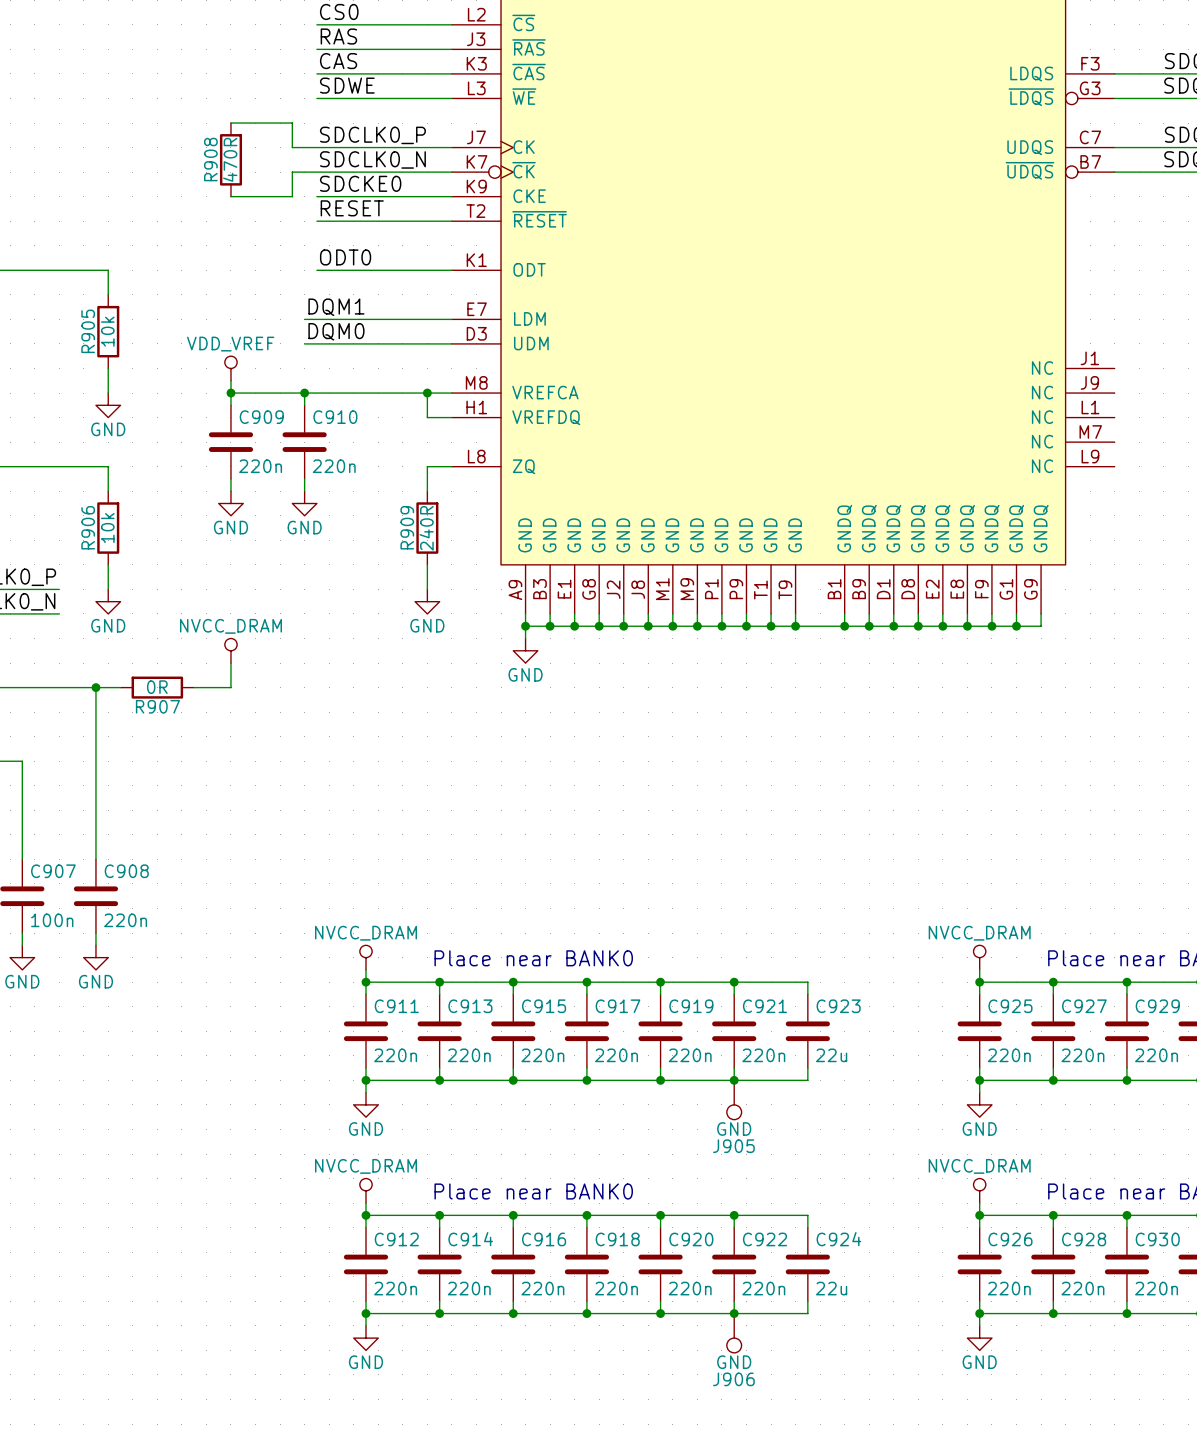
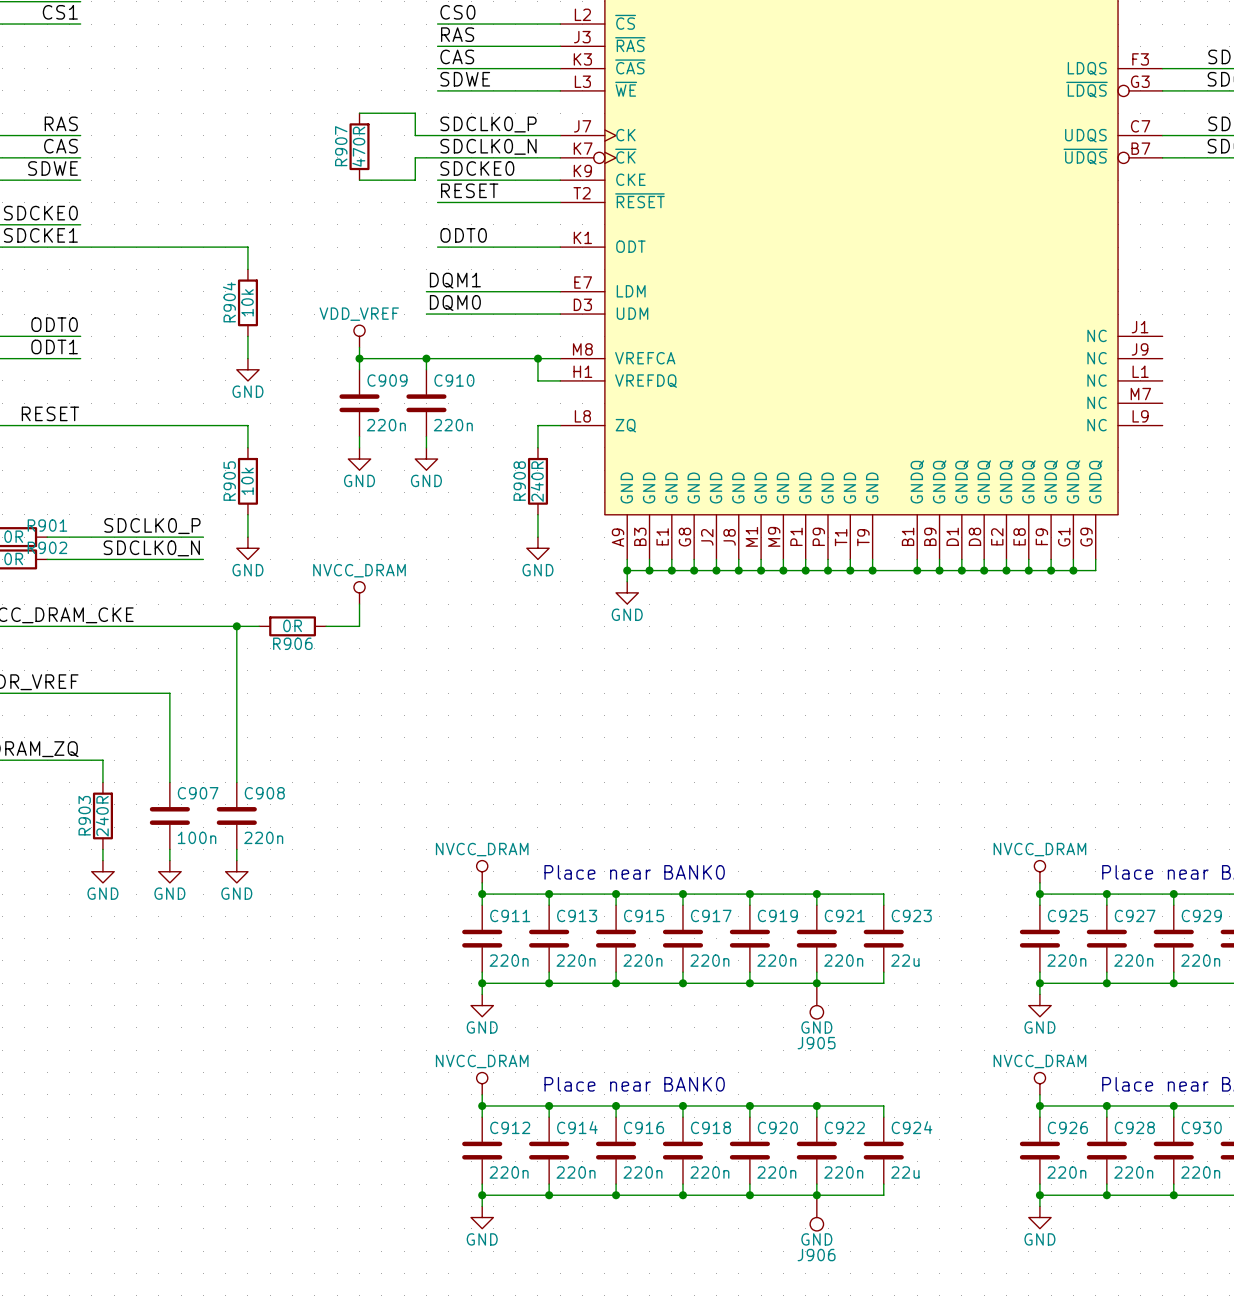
R908 name: R908 (210, 159) -> R907 (341, 146)
R905 name: R905 (88, 331) -> R904 (229, 302)
R906 name: R906 (88, 527) -> R905 (229, 481)
R909 name: R909 (407, 527) -> R908 (519, 481)
R907 name: R907 (157, 706) -> R906 (292, 643)

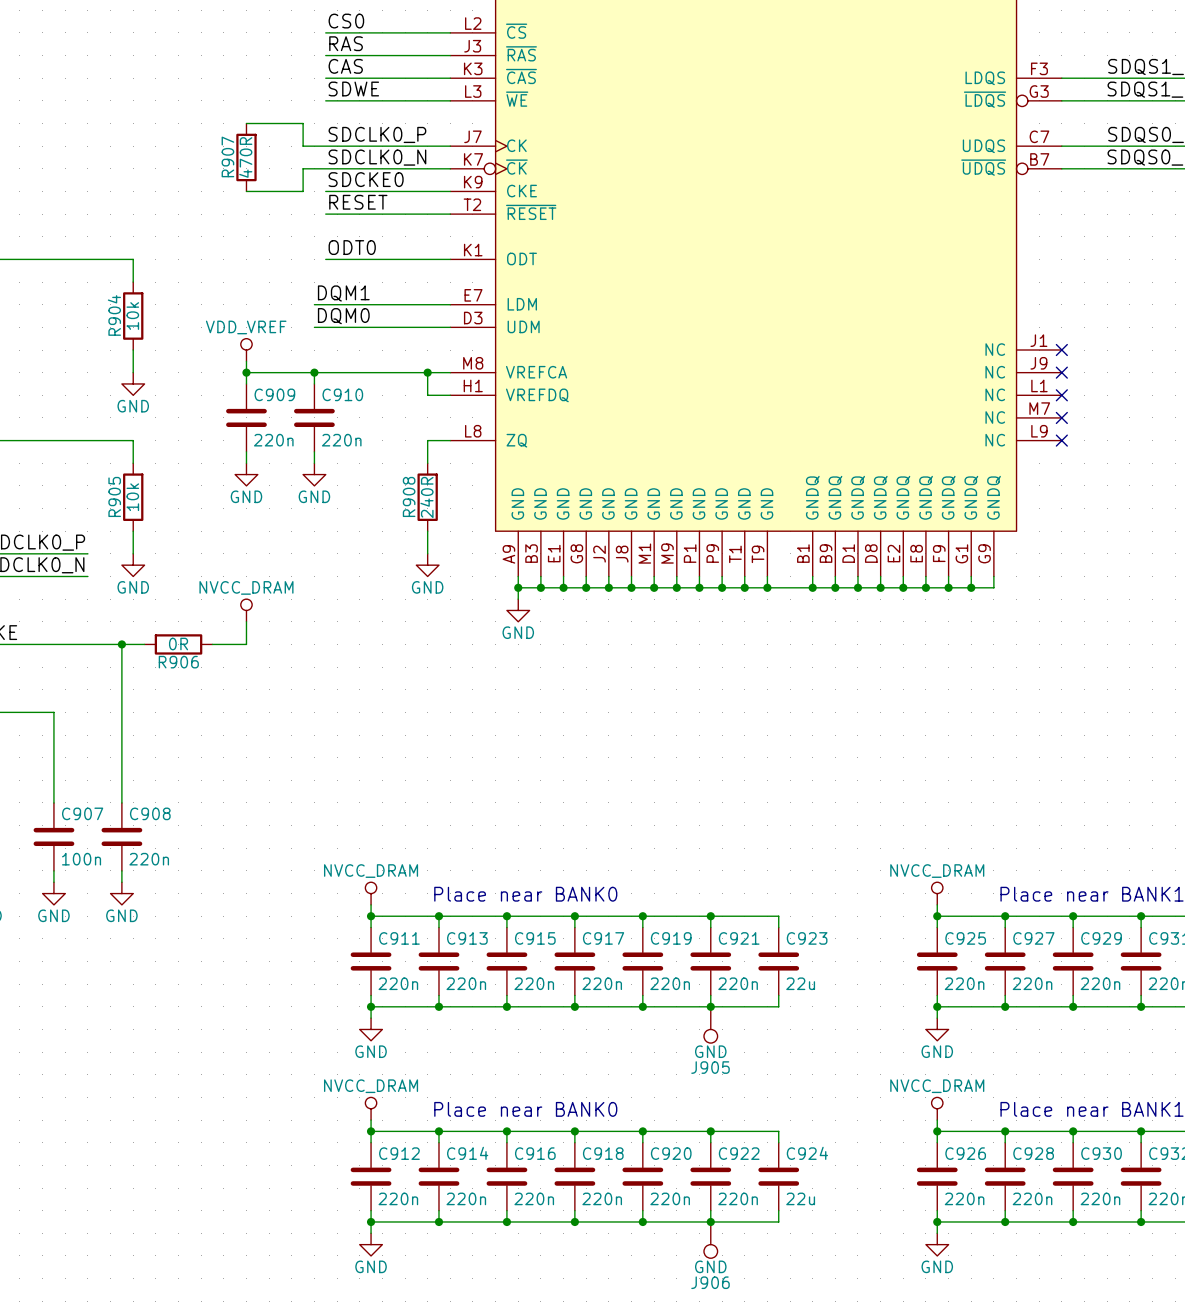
no-connect mark: none -> (1061, 350)
no-connect mark: none -> (1061, 372)
no-connect mark: none -> (1061, 395)
no-connect mark: none -> (1061, 417)
no-connect mark: none -> (1061, 440)

